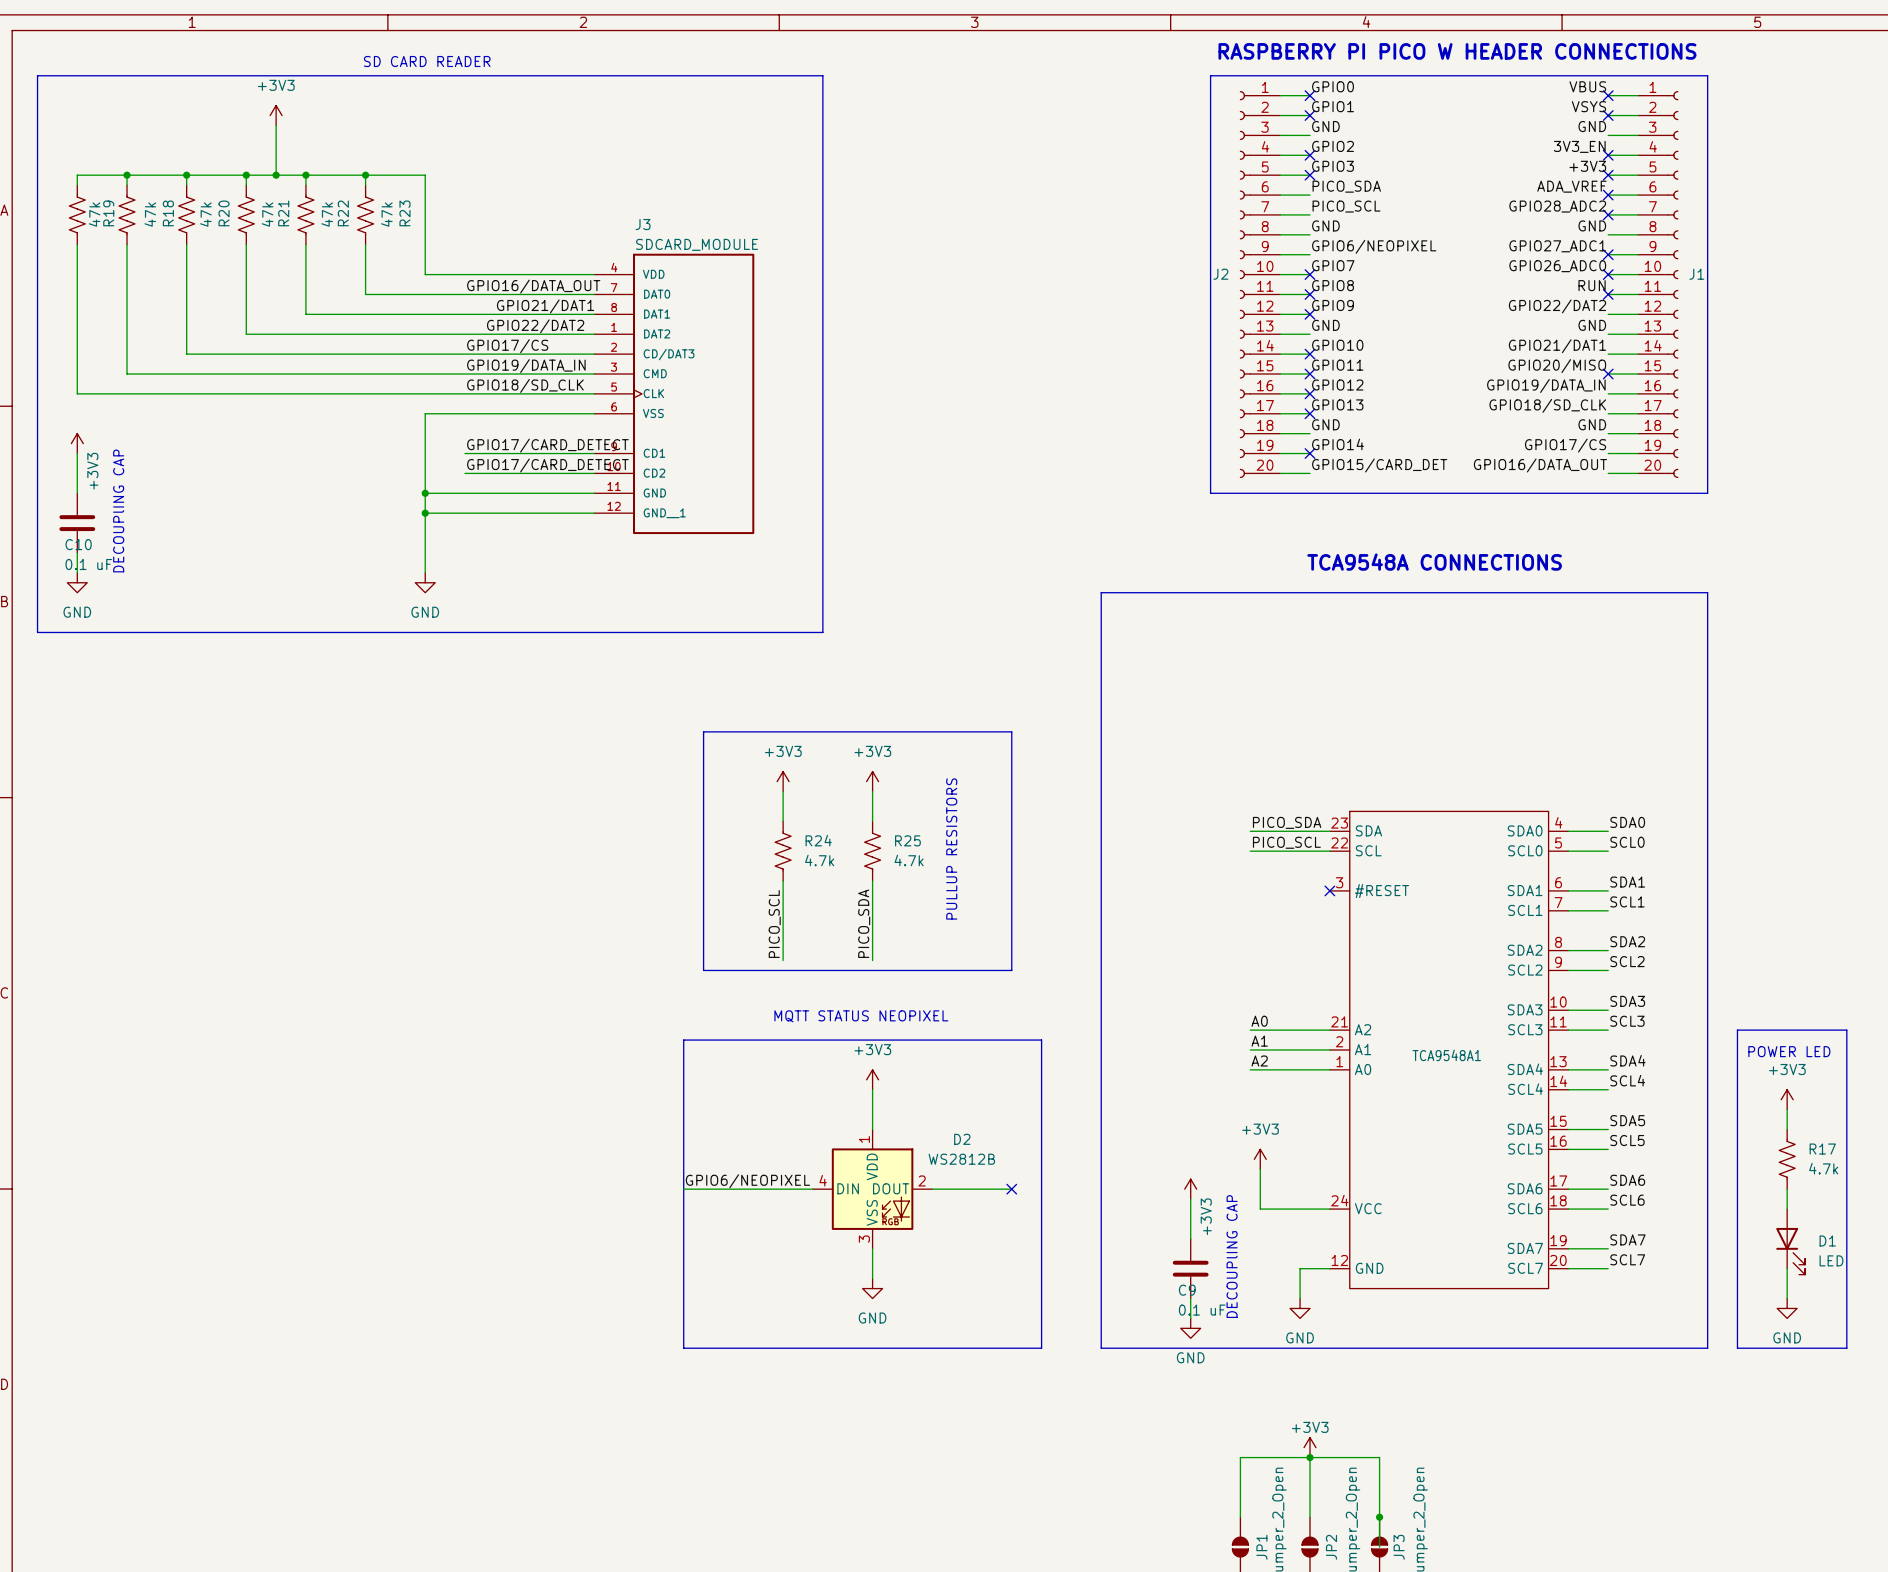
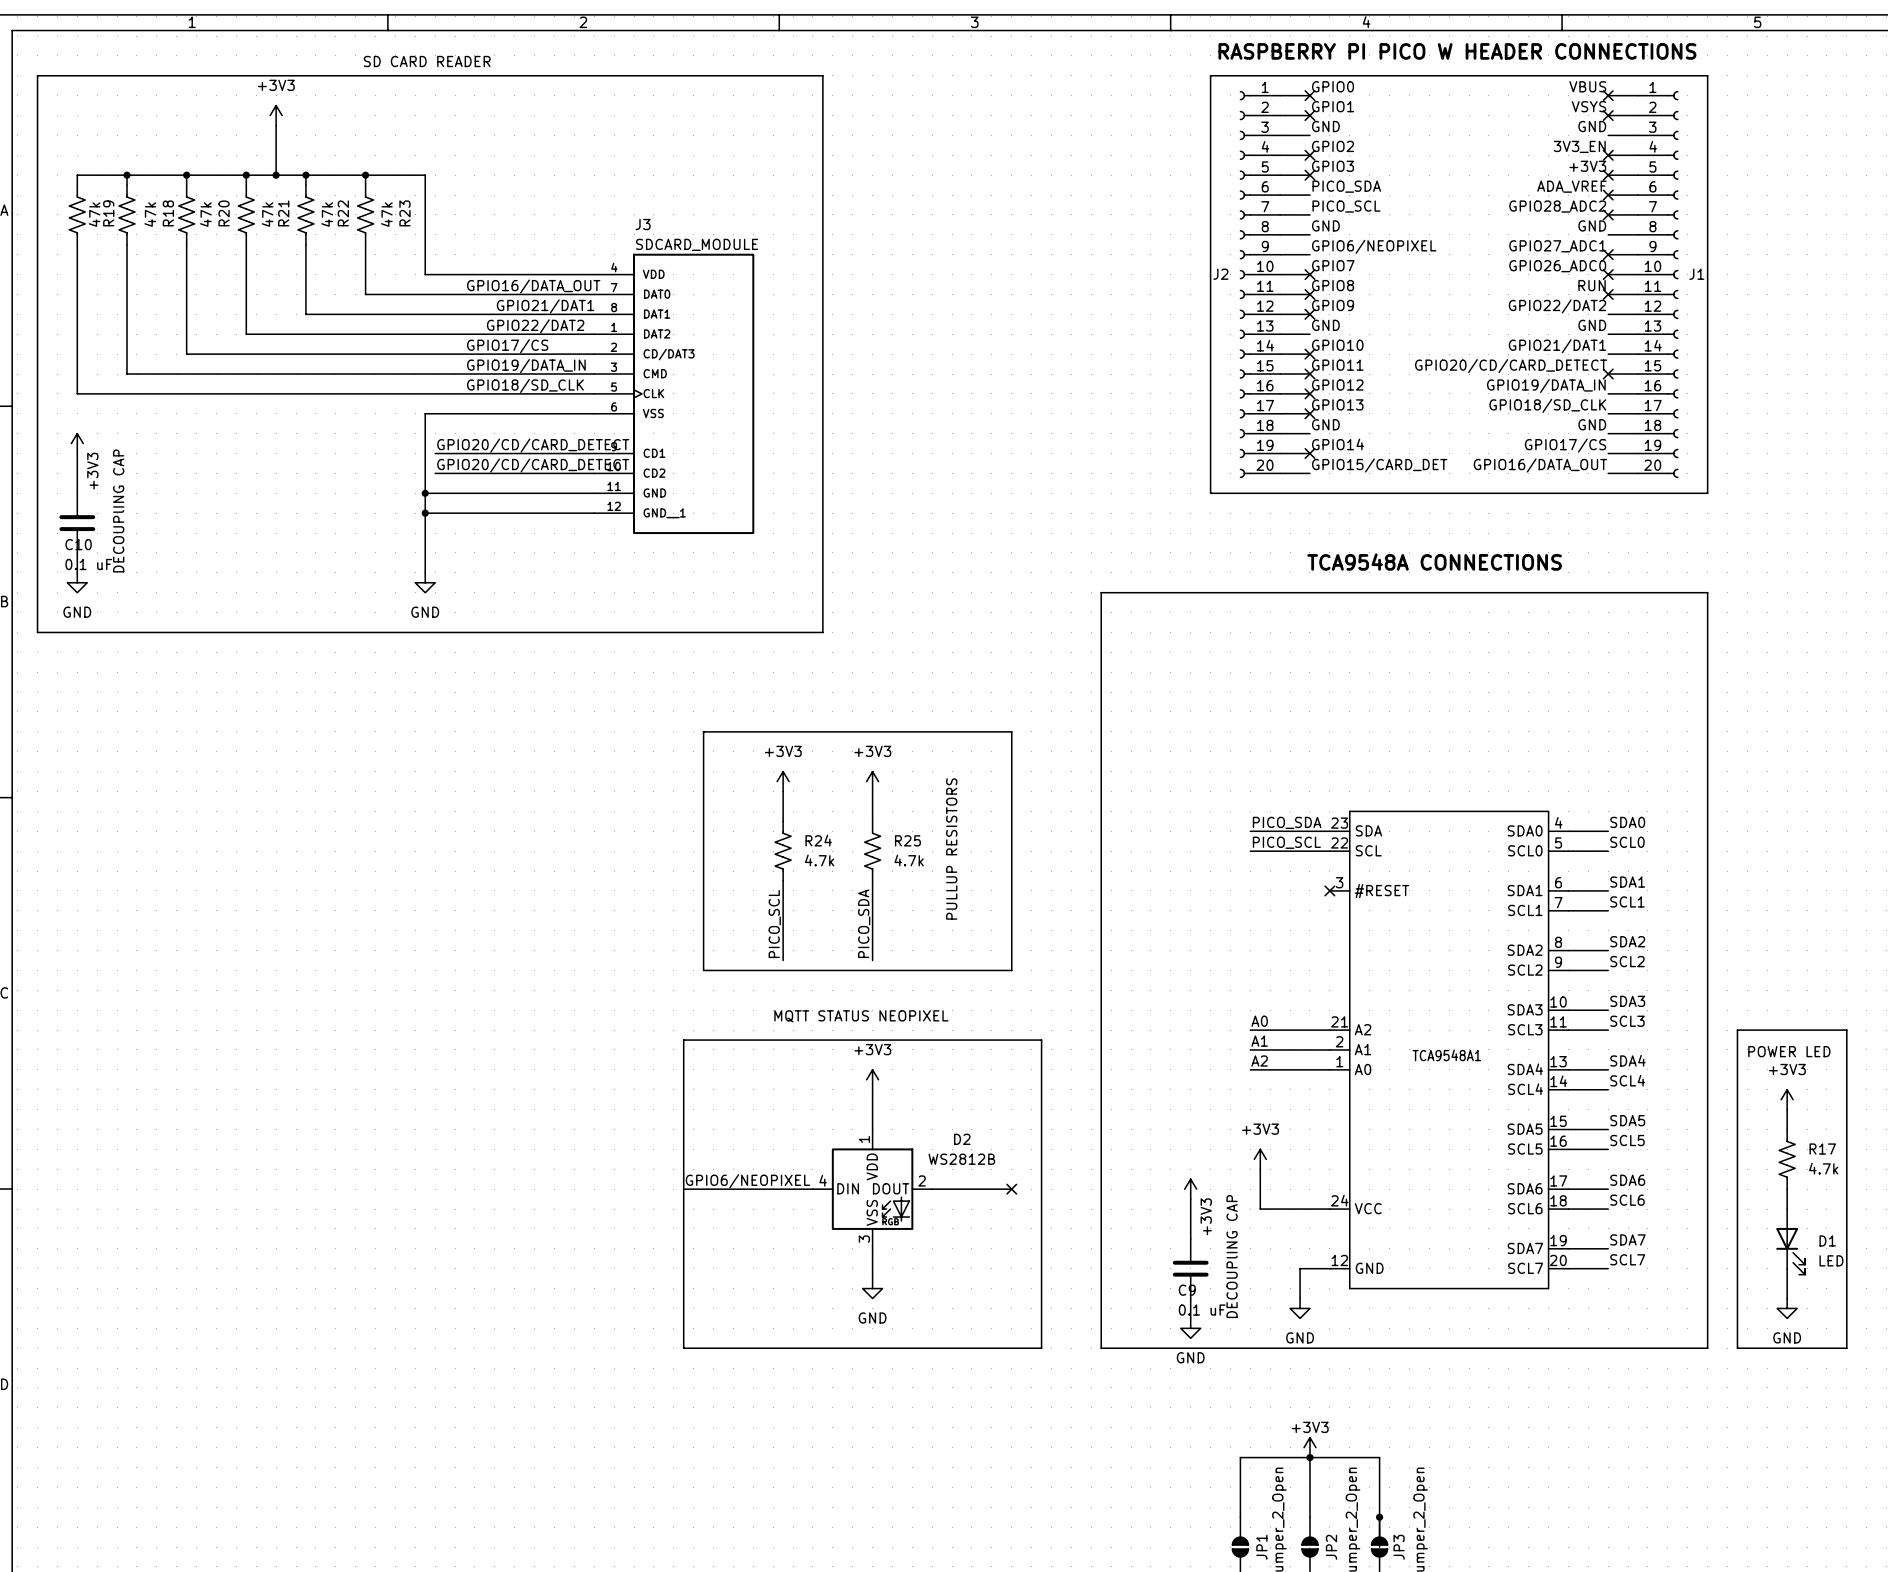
label: GPIO20/MISO (1557, 366) -> GPIO20/CD/CARD_DETECT (1511, 366)
label: none -> GPIO20/CD/CARD_DETECT (533, 445)
label: GPIO17/CARD_DETECT (547, 445) -> none
wire: none -> (435, 453) (465, 453)
label: none -> GPIO20/CD/CARD_DETECT (533, 465)
label: GPIO17/CARD_DETECT (547, 465) -> none
wire: none -> (435, 473) (465, 473)

